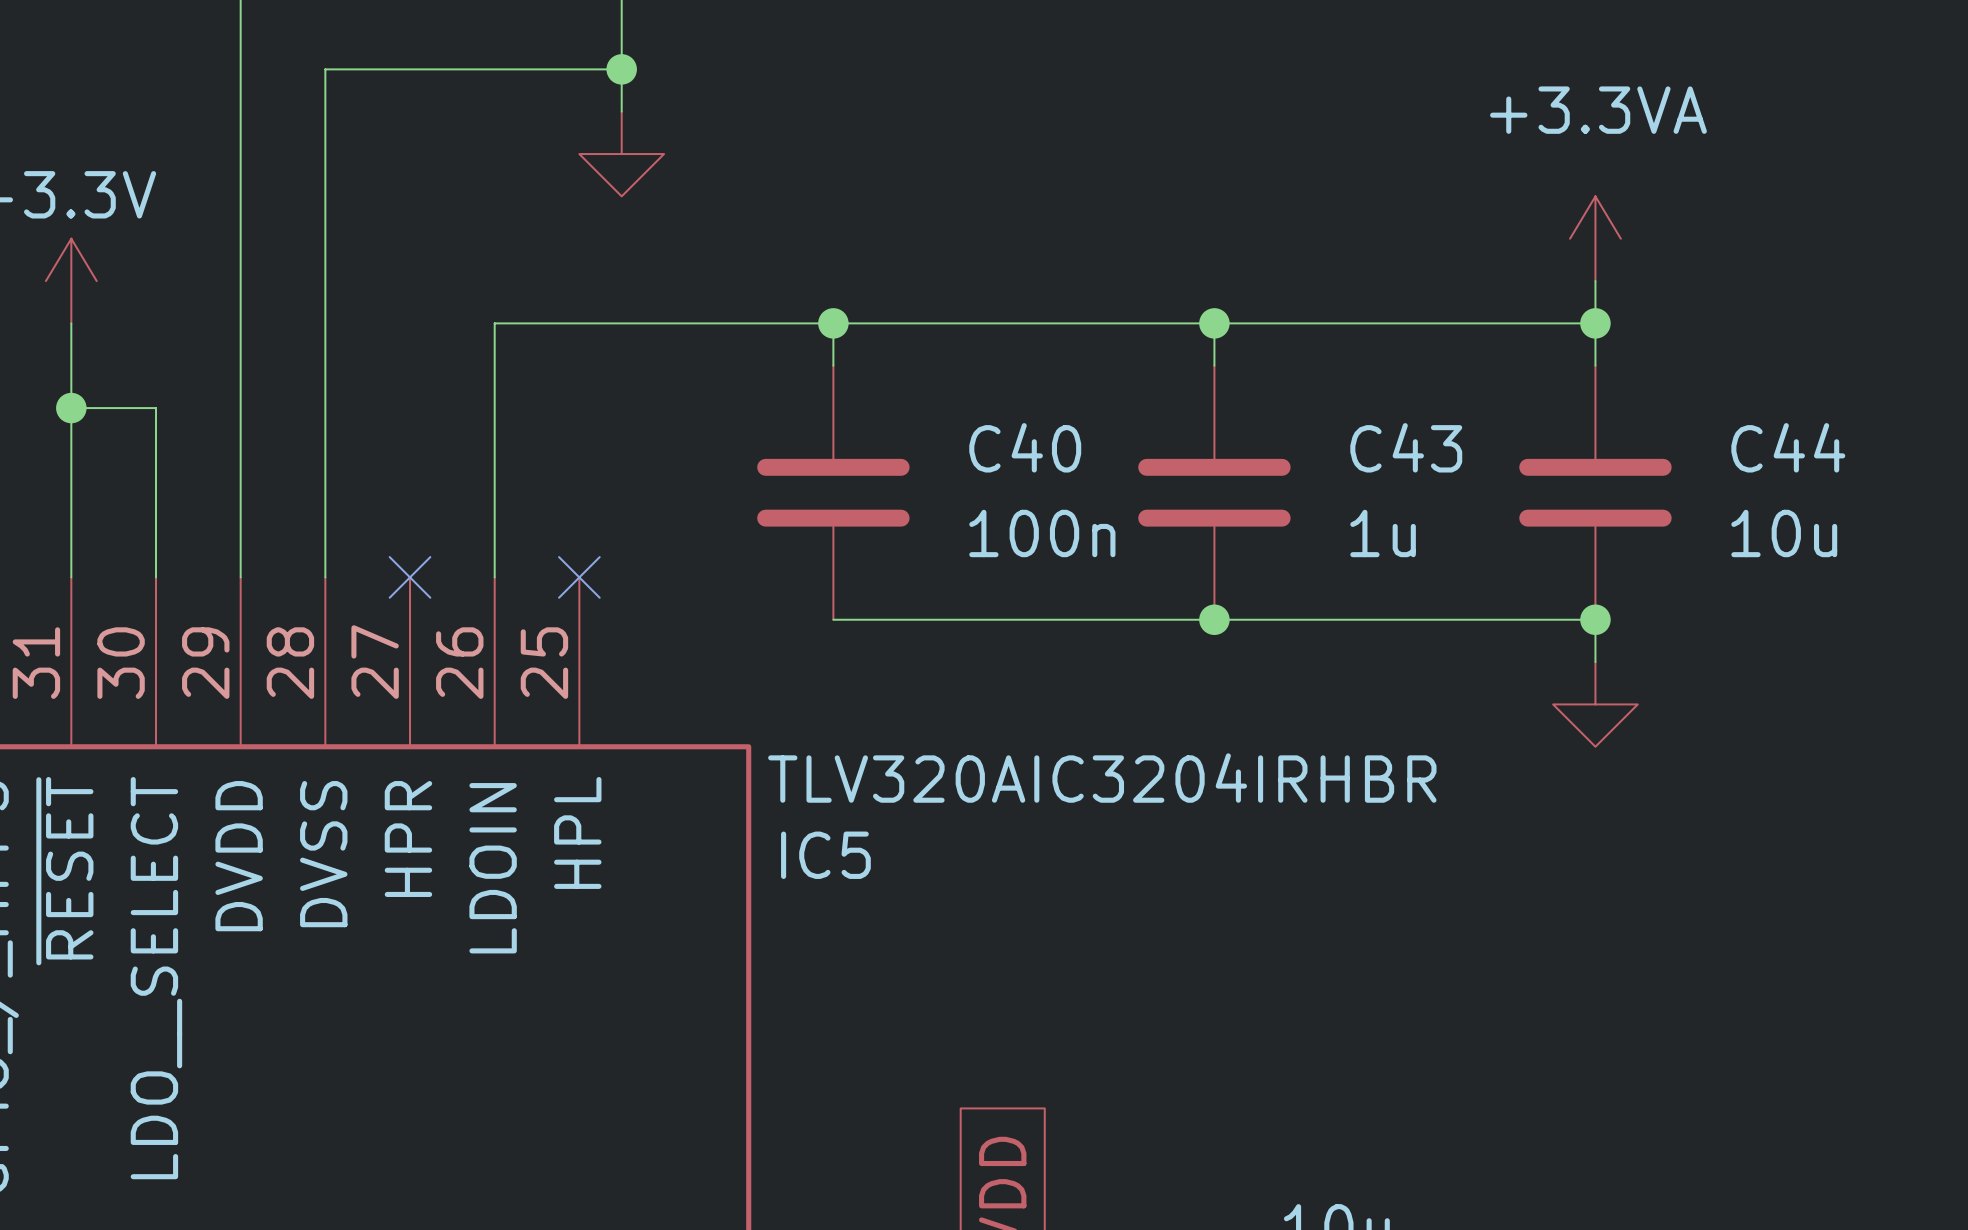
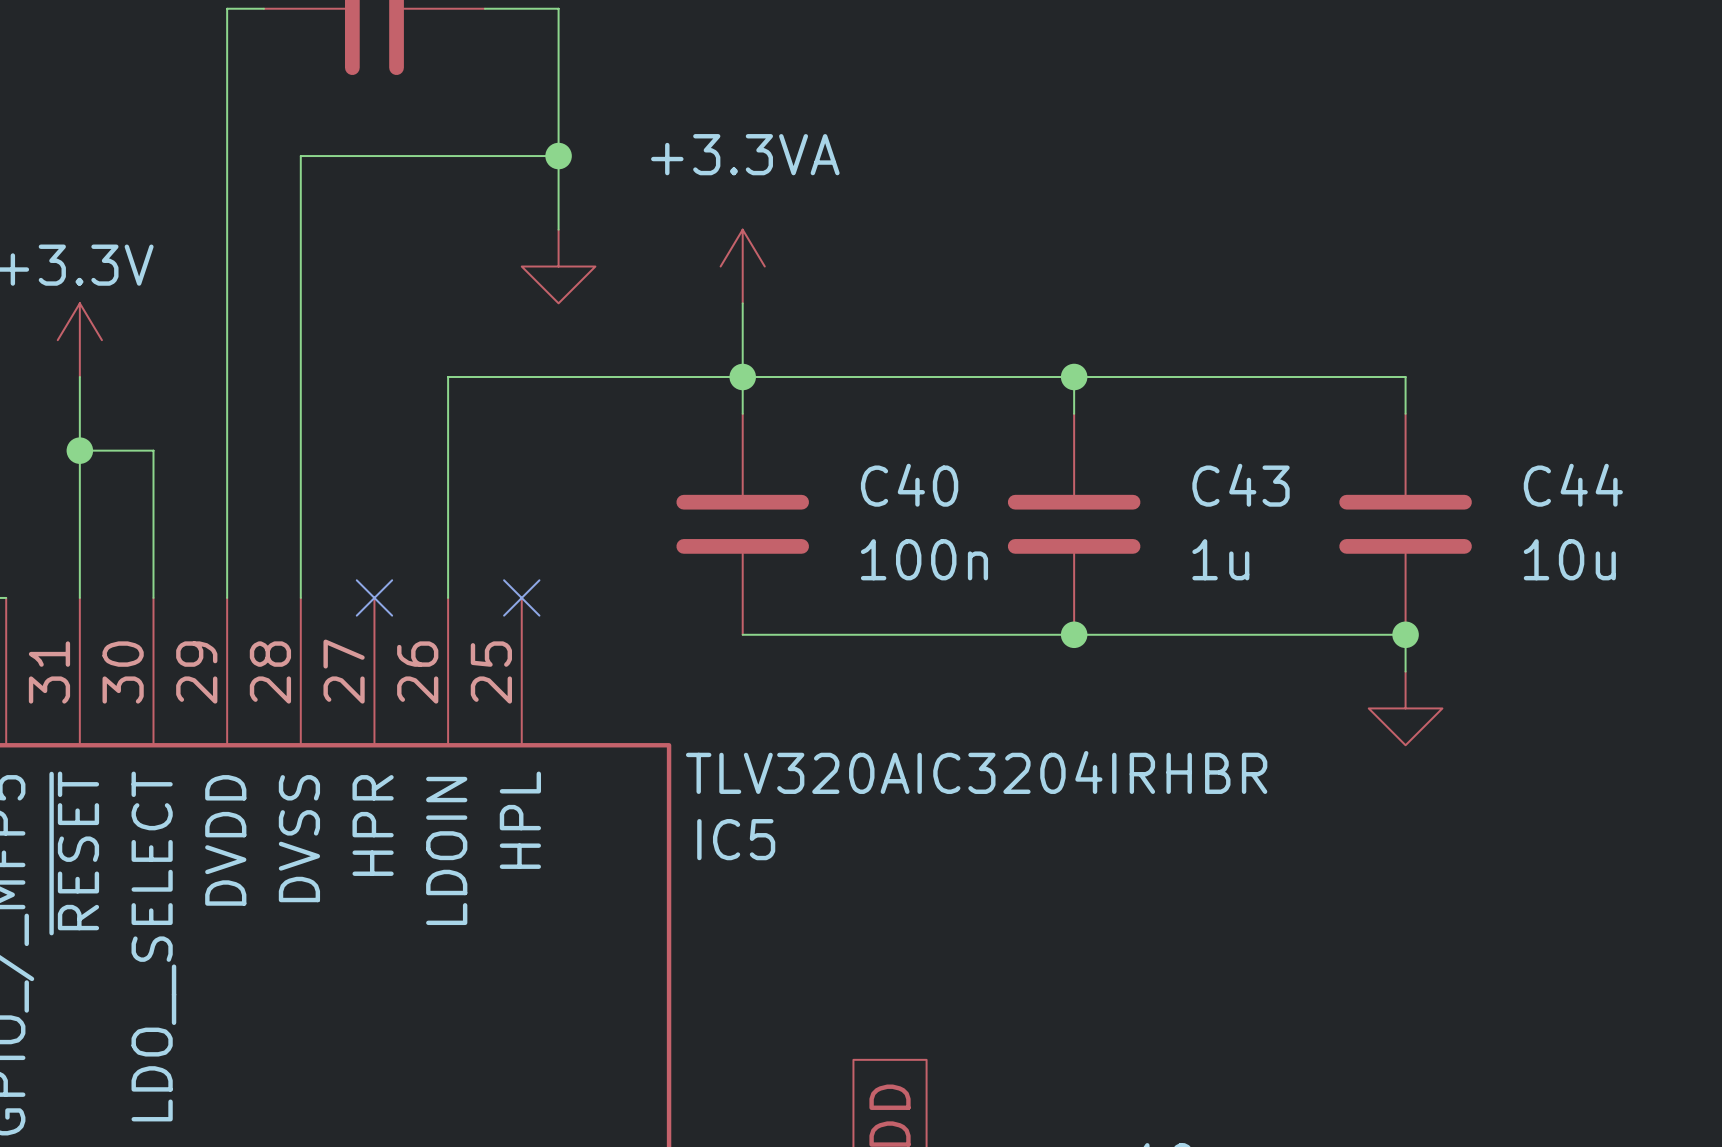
power symbol position: (621, 154) -> (558, 266)
wire: none -> (742, 303) (742, 377)
power symbol position: +3.3VA (1595, 238) -> +3.3VA (742, 266)
wire: (1595, 281) (1595, 323) -> none
junction: (1595, 323) -> none

